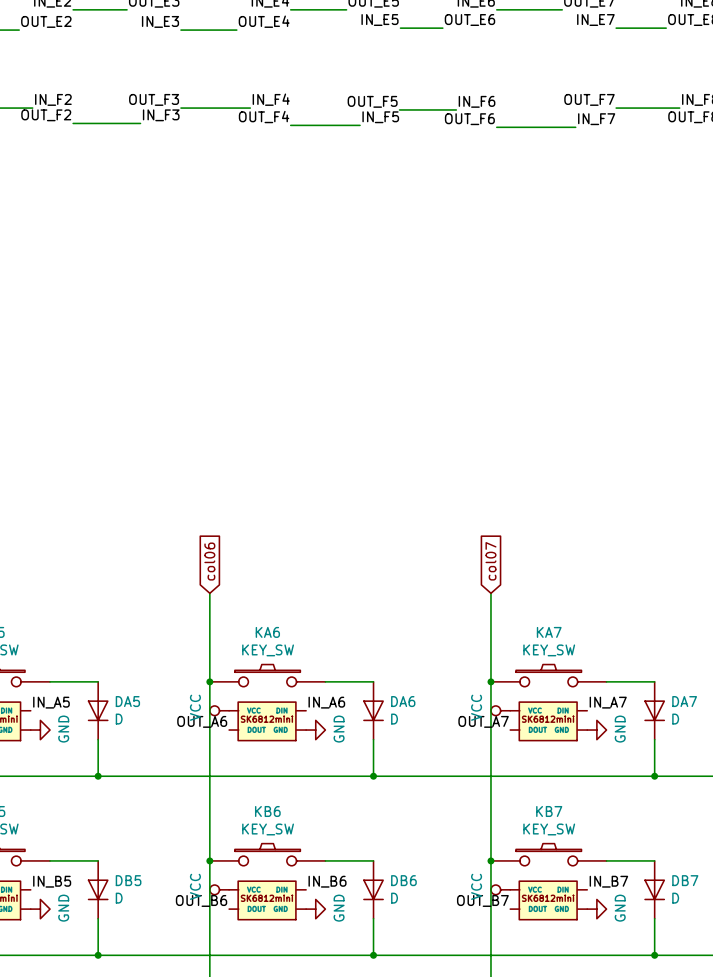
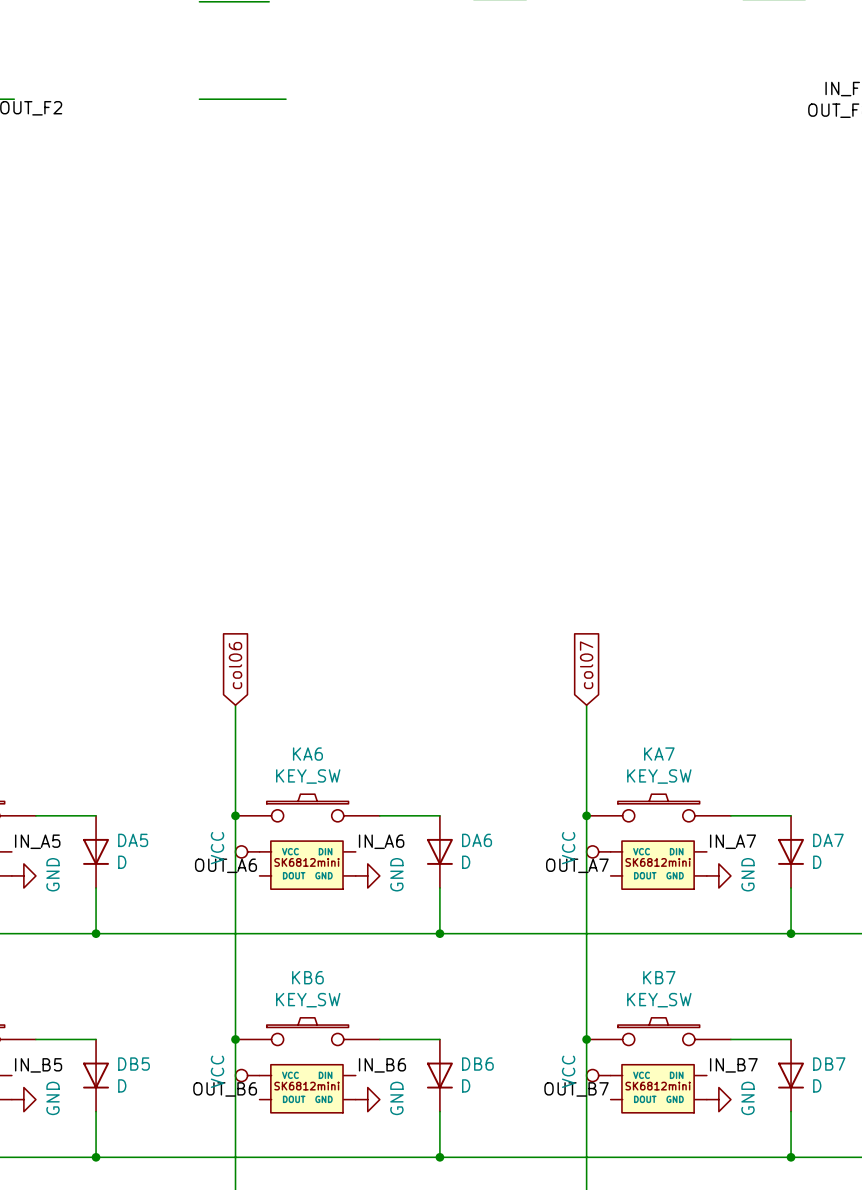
label: IN_F2 (53, 99) -> none
label: OUT_F3 (154, 99) -> none
label: IN_F4 (271, 99) -> none
label: OUT_F7 (589, 99) -> none
label: OUT_F5 (372, 101) -> none
label: IN_F6 (477, 101) -> none
wire: (616, 108) (679, 108) -> none
wire: (399, 109) (456, 109) -> none
label: IN_F3 (161, 115) -> none
label: OUT_F4 (264, 117) -> none
label: IN_F5 (380, 117) -> none
label: OUT_F6 (469, 119) -> none
label: IN_F7 (596, 119) -> none
wire: (73, 123) (140, 123) -> none
wire: (290, 125) (360, 125) -> none
wire: (496, 127) (575, 127) -> none

